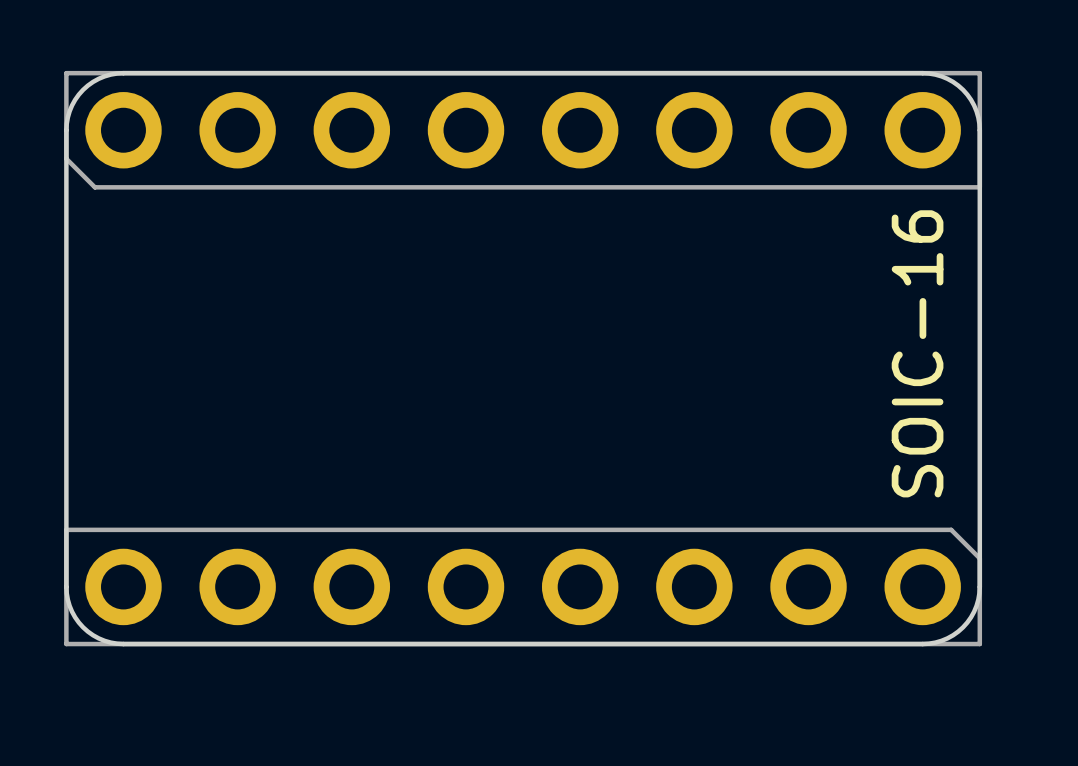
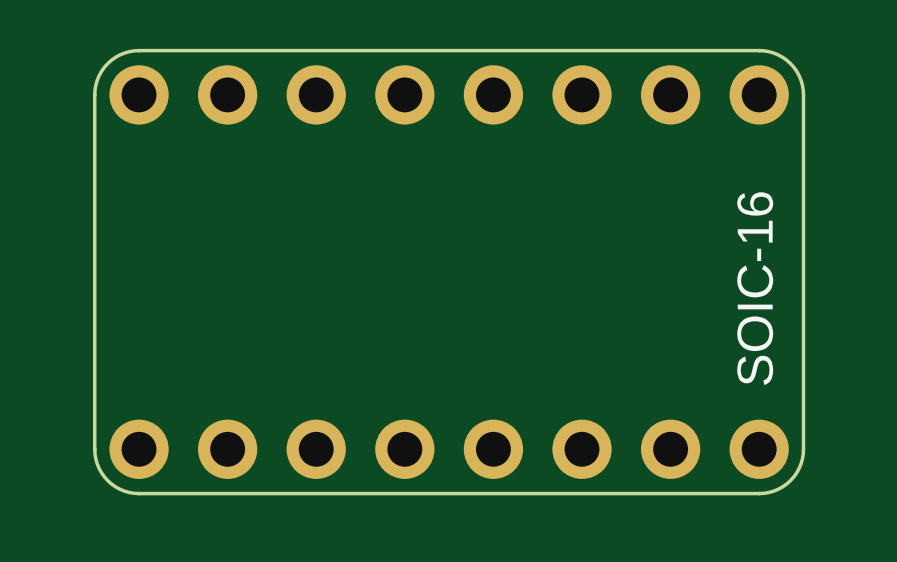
part side: bottom (523, 130) -> top (449, 94)
part side: bottom (523, 586) -> top (449, 449)

